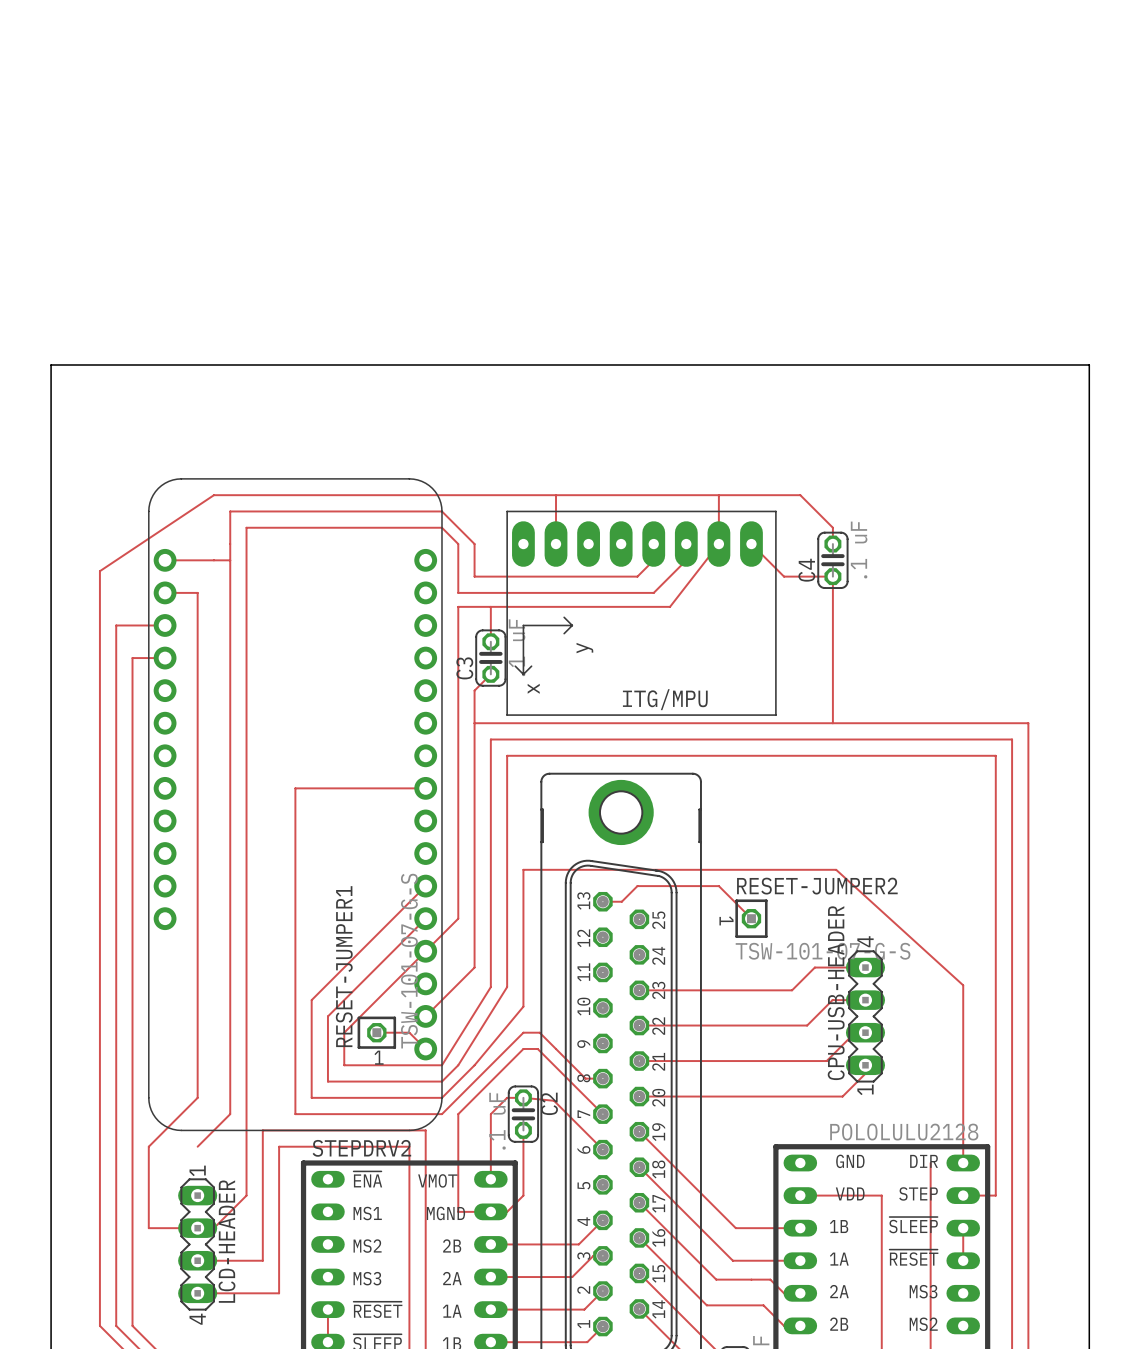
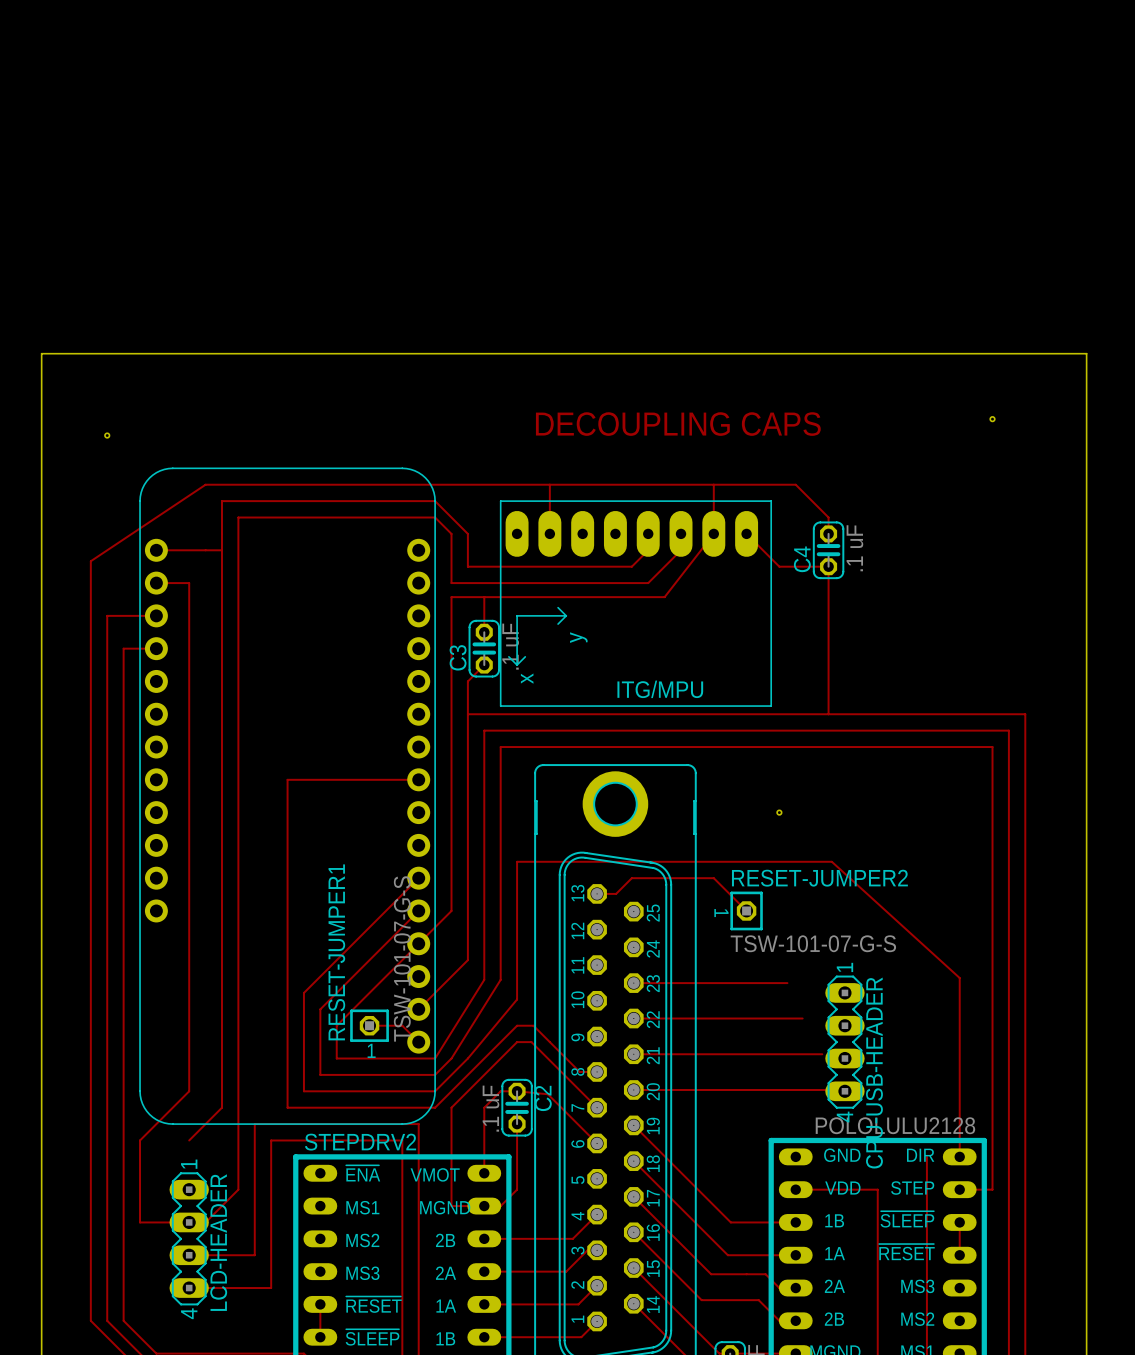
hole: none -> (992, 419)
text: none -> DECOUPLING CAPS (678, 424)
hole: none -> (107, 435)
hole: none -> (779, 812)
track: (865, 967) (814, 967) (792, 990) -> none
track: (865, 1000) (832, 1000) (807, 1025) -> none
CPU-USB-HEADER: (865, 1016) -> none
track: (865, 1032) (855, 1032) (826, 1061) -> none
CPU-USB-HEADER: none -> (844, 1042)
track: (865, 1065) (865, 1073) (842, 1096) -> none

